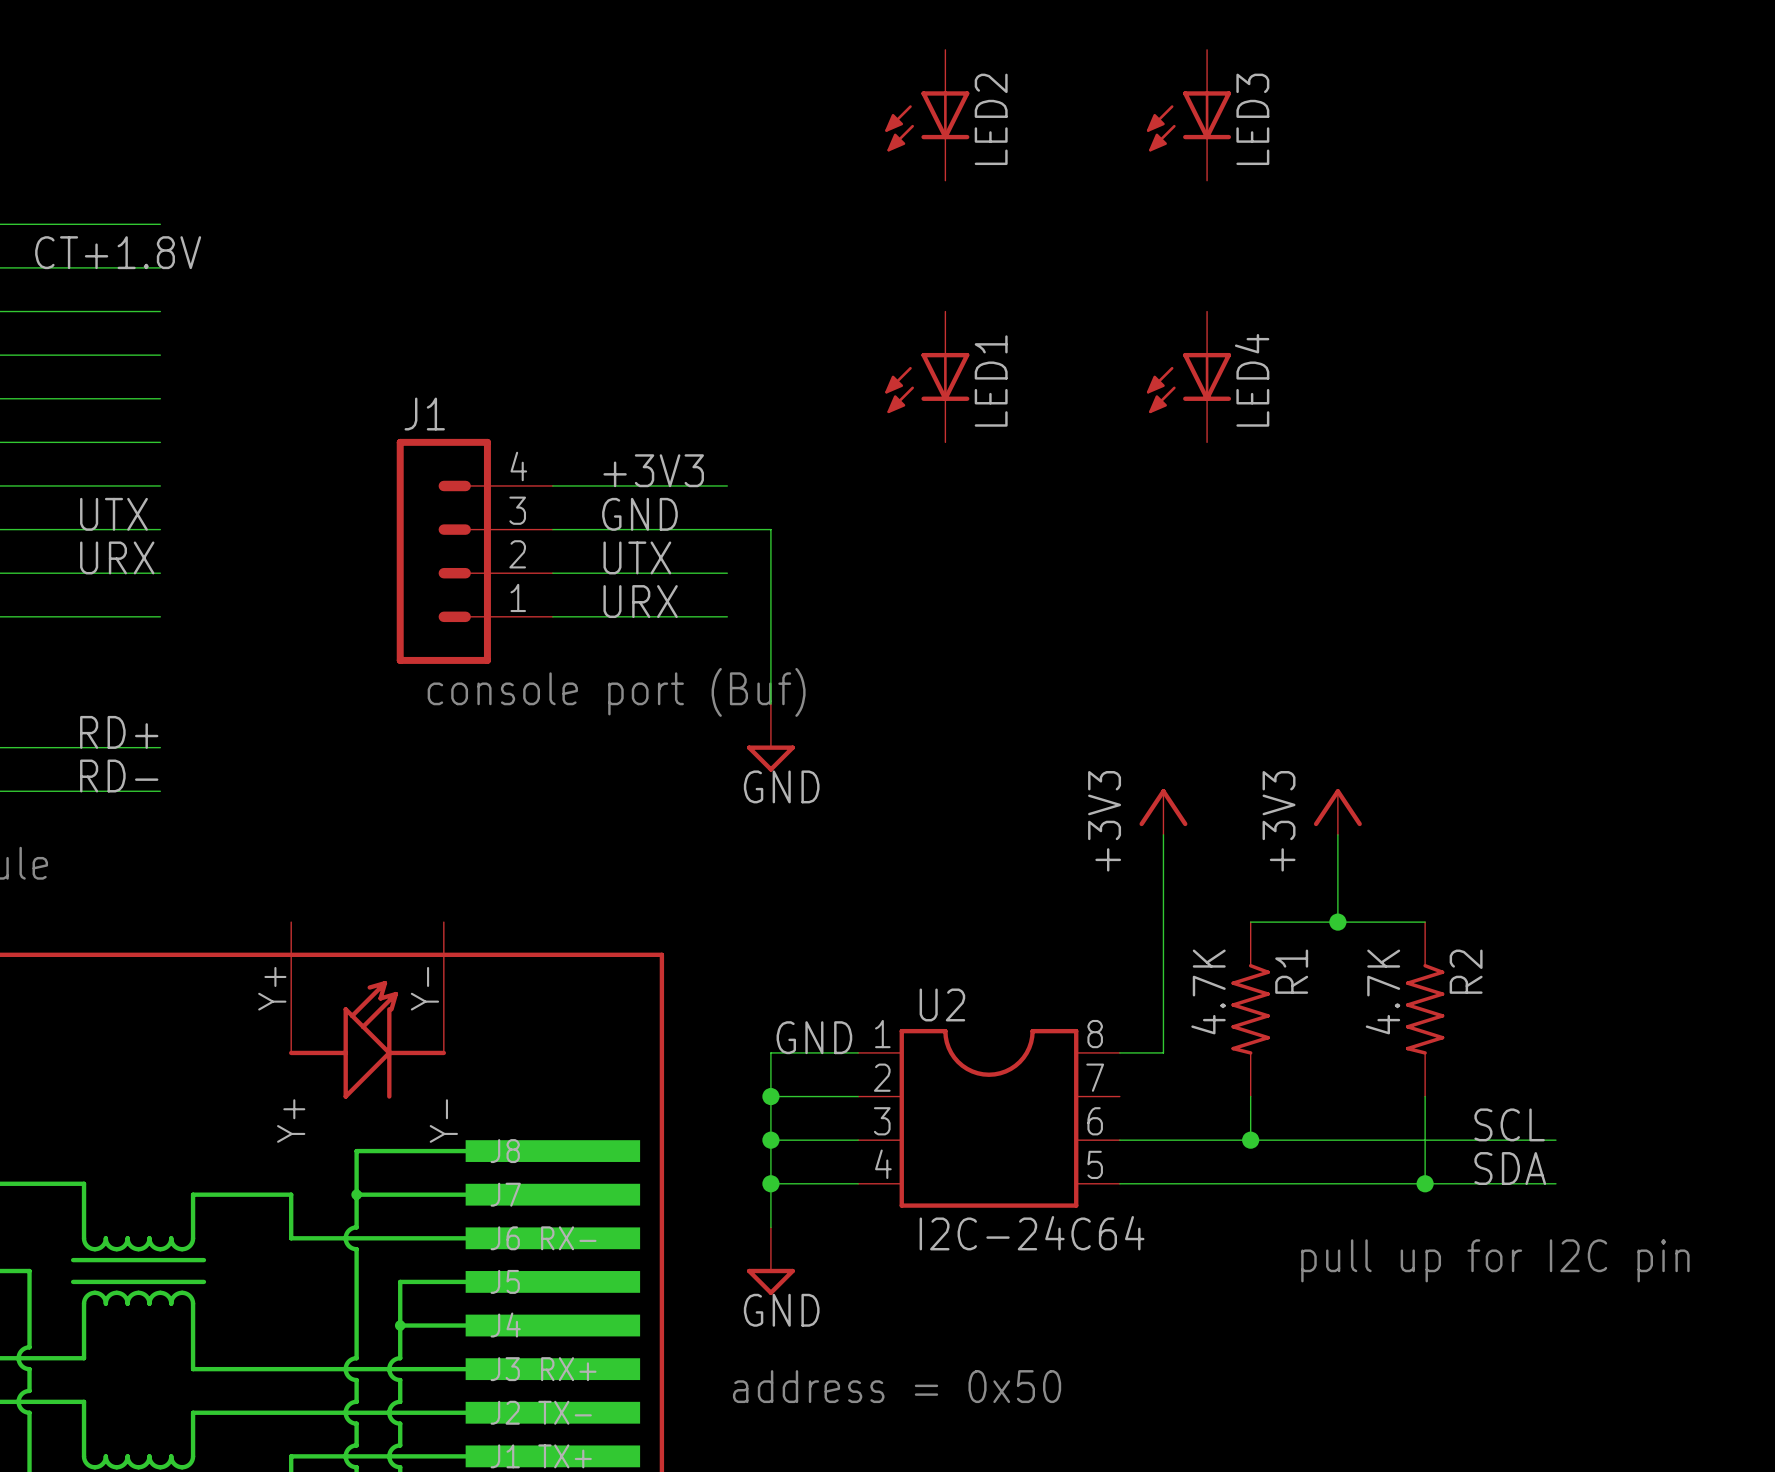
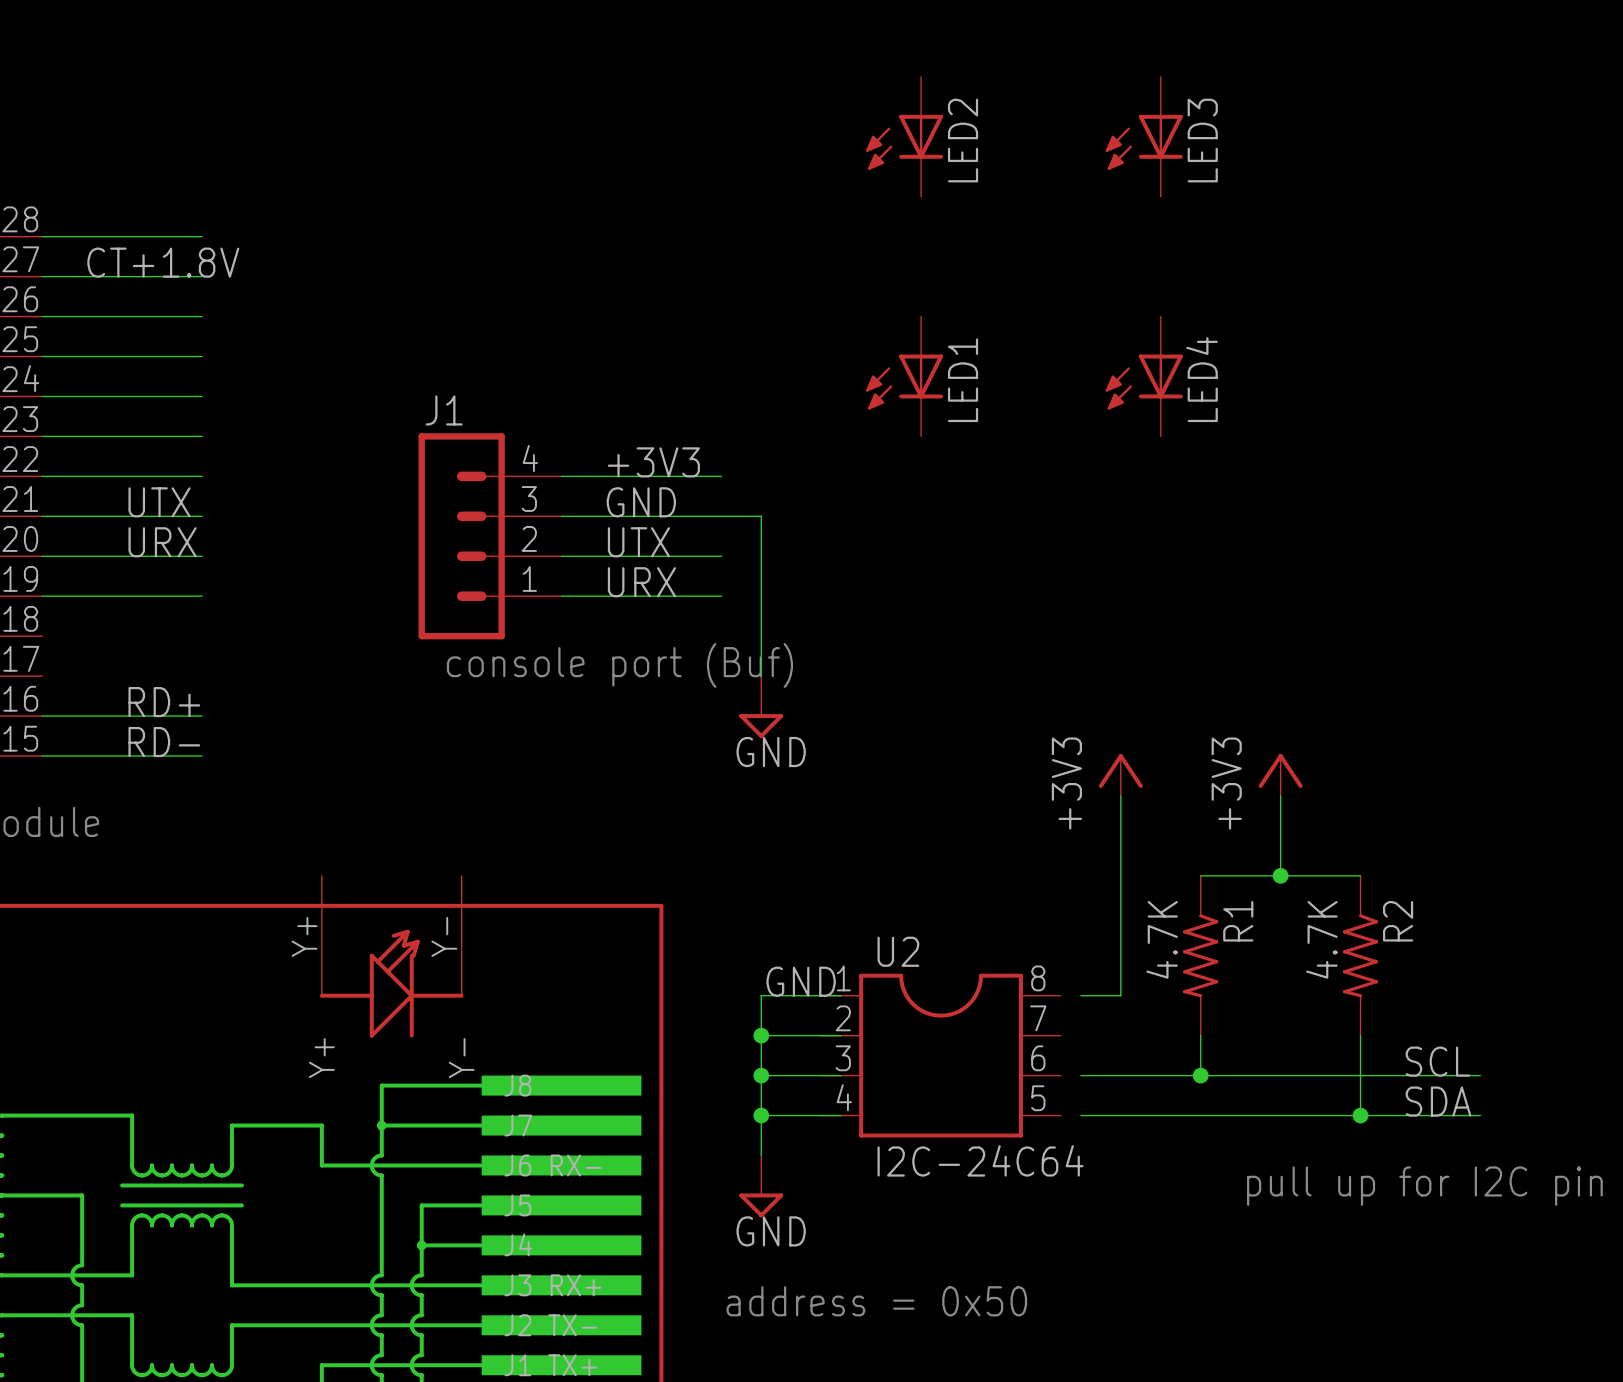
U2 position: (988, 1118) -> (941, 1055)

